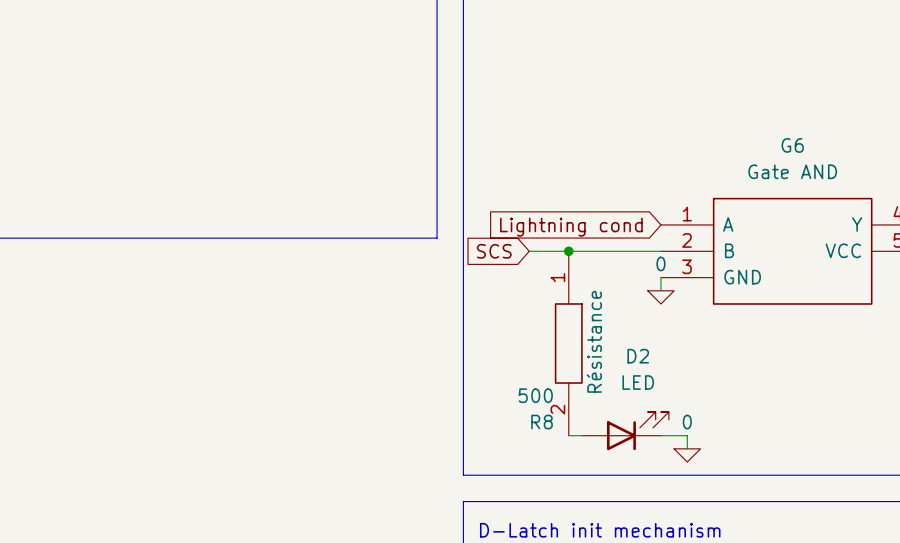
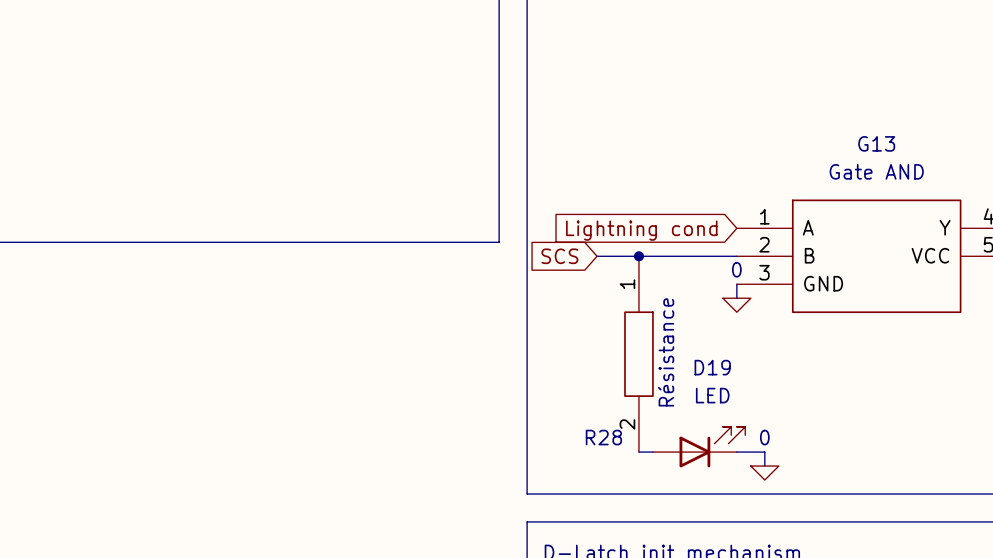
G6 name: G6 (792, 145) -> G13 (876, 143)
D2 name: D2 (638, 356) -> D19 (712, 367)
R8 text: 500 (535, 395) -> none
R8 name: R8 (542, 422) -> R28 (603, 437)

